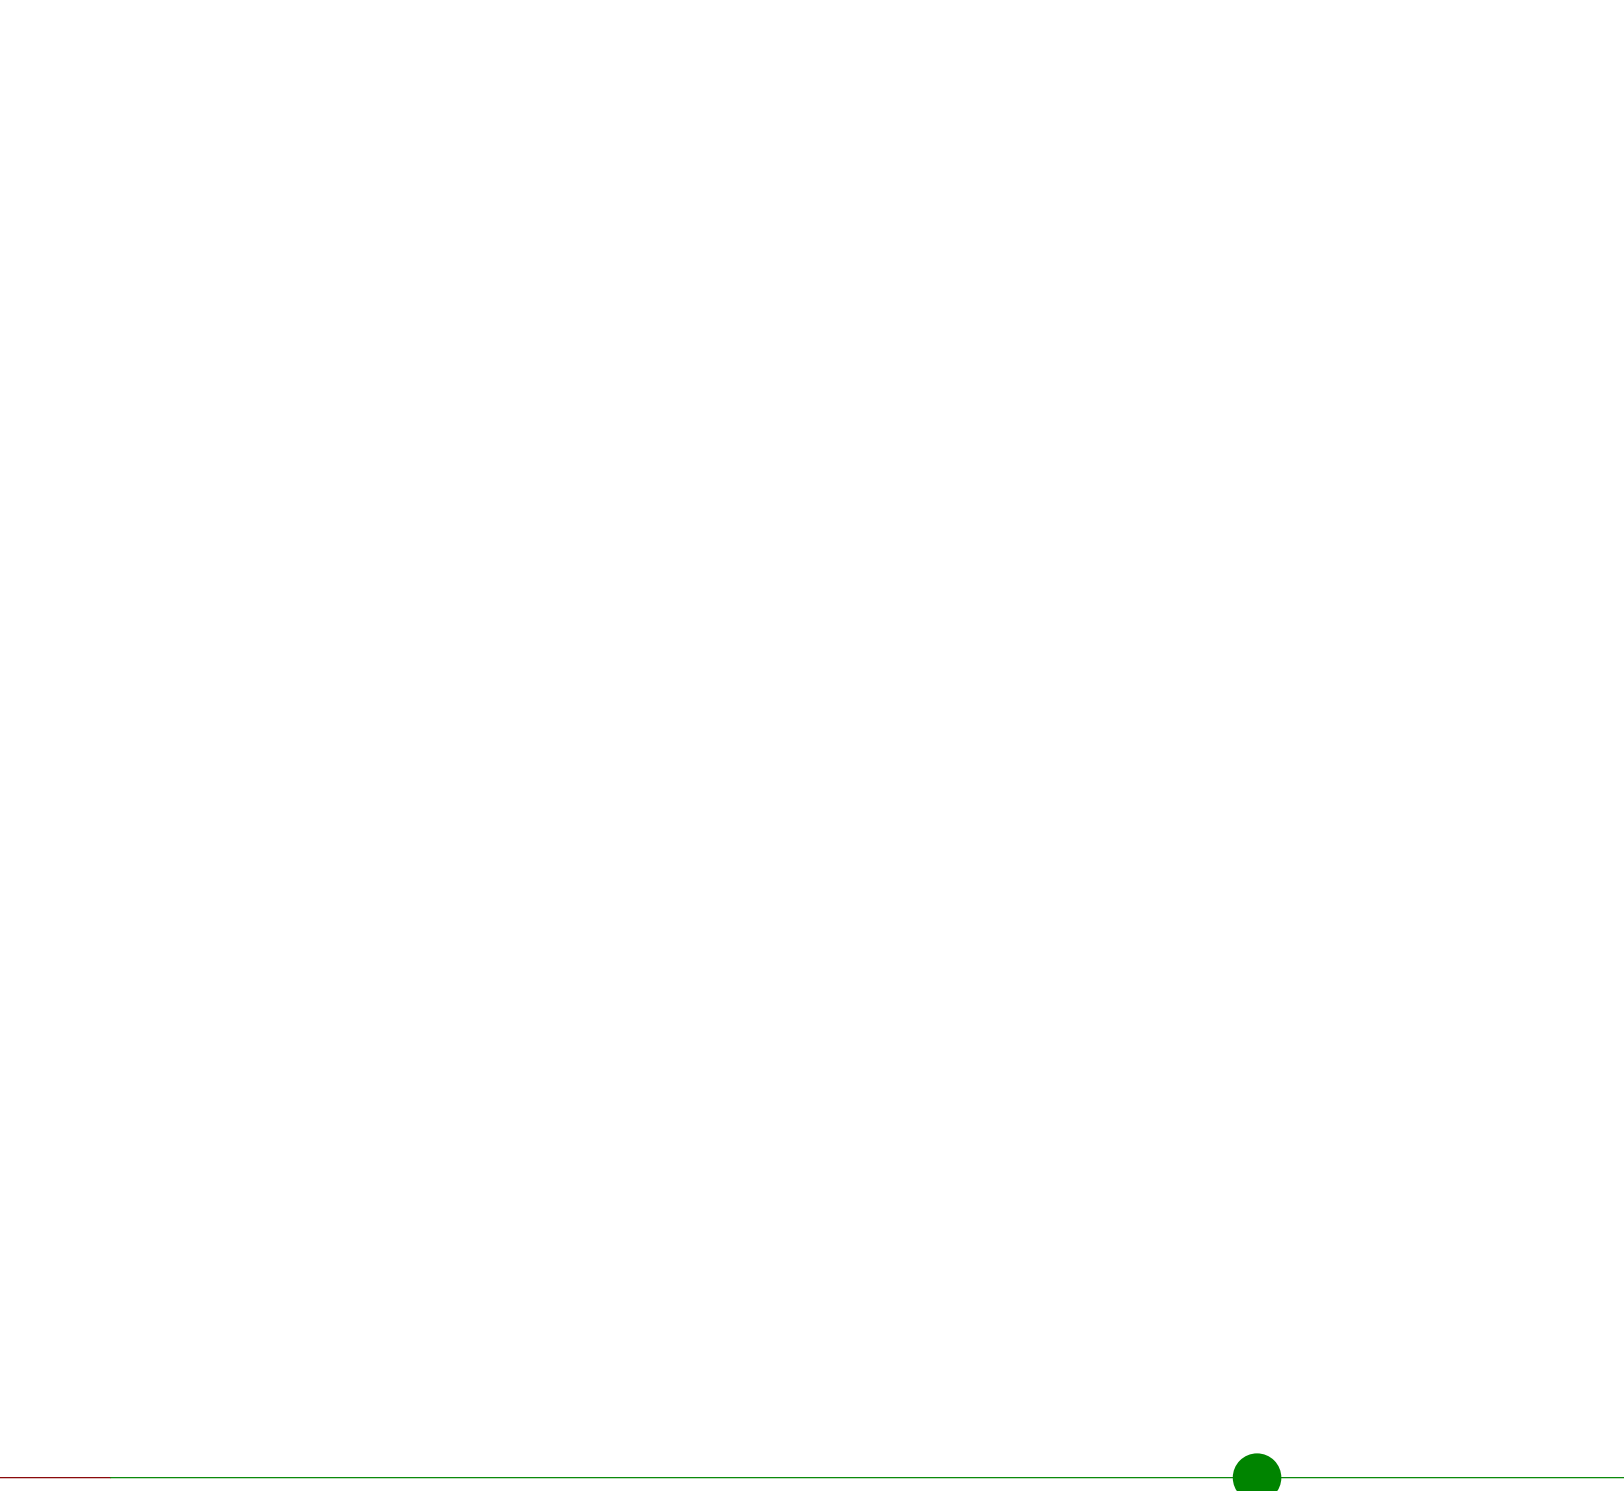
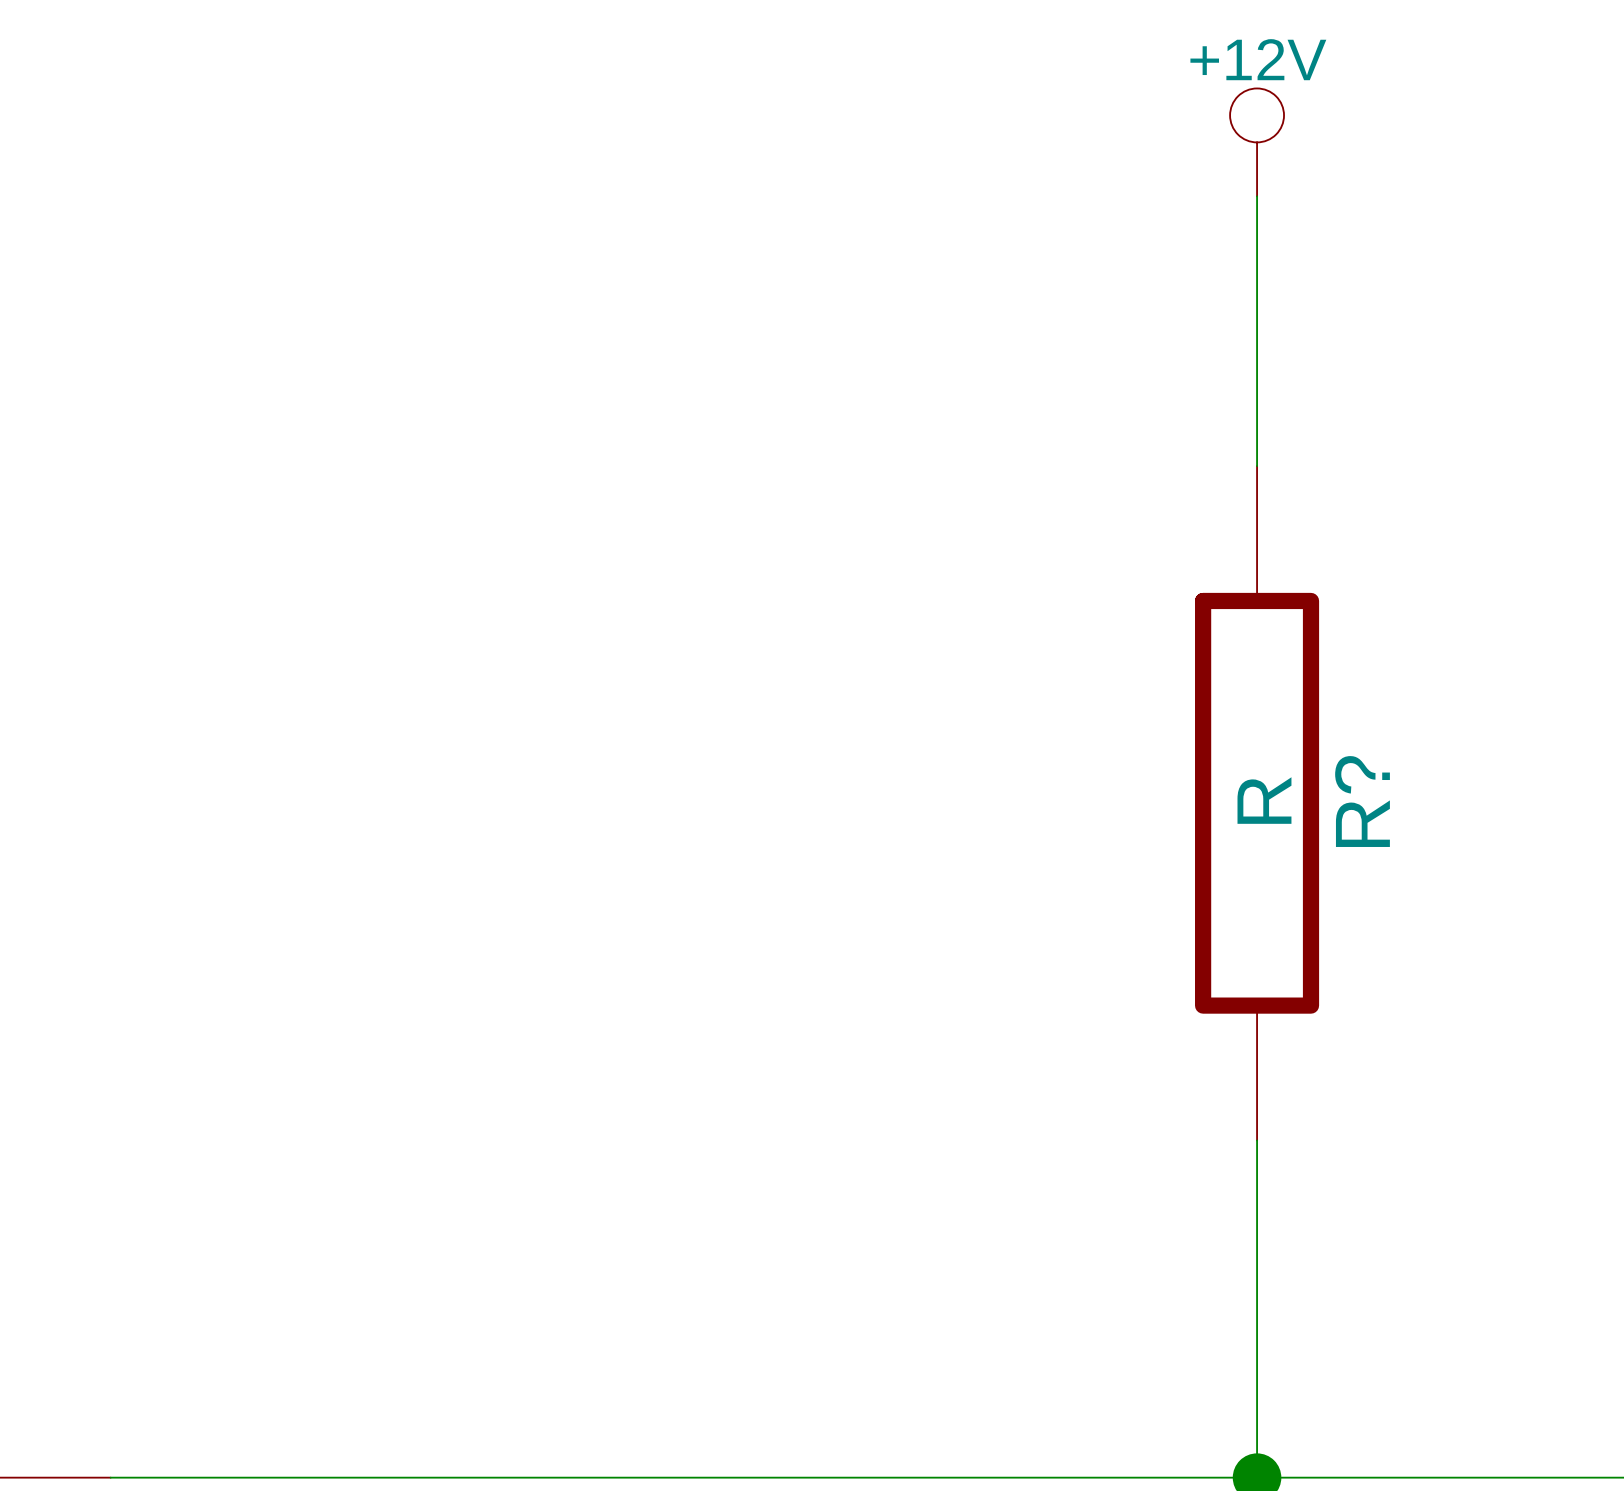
power symbol: none -> +12V (1257, 142)
wire: none -> (1257, 196) (1257, 466)
R?: none -> R (1257, 803)
wire: none -> (1257, 1140) (1257, 1477)

